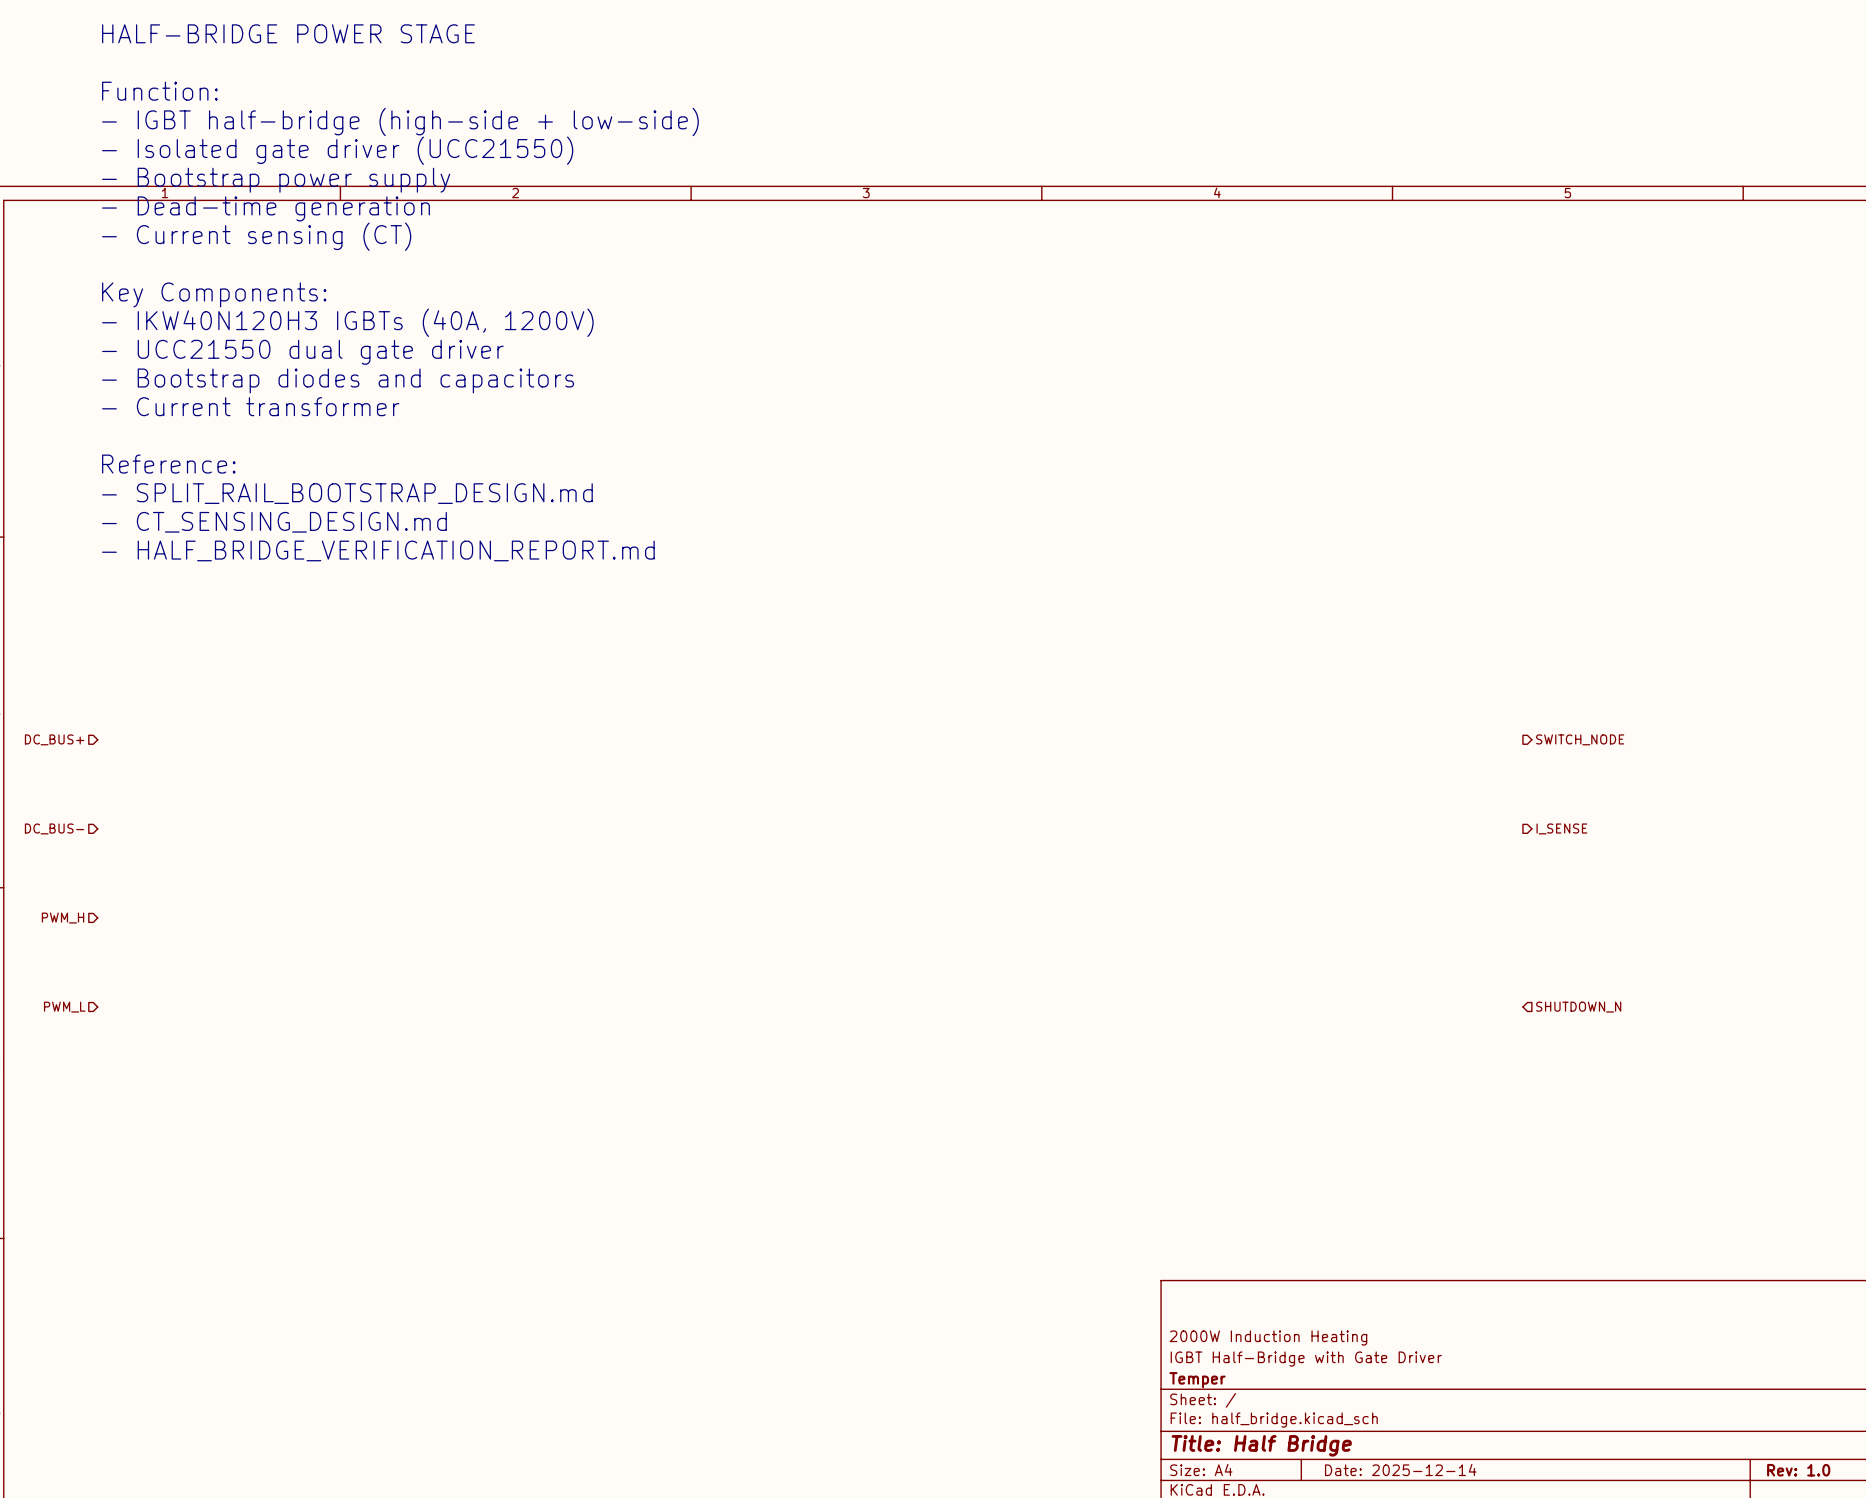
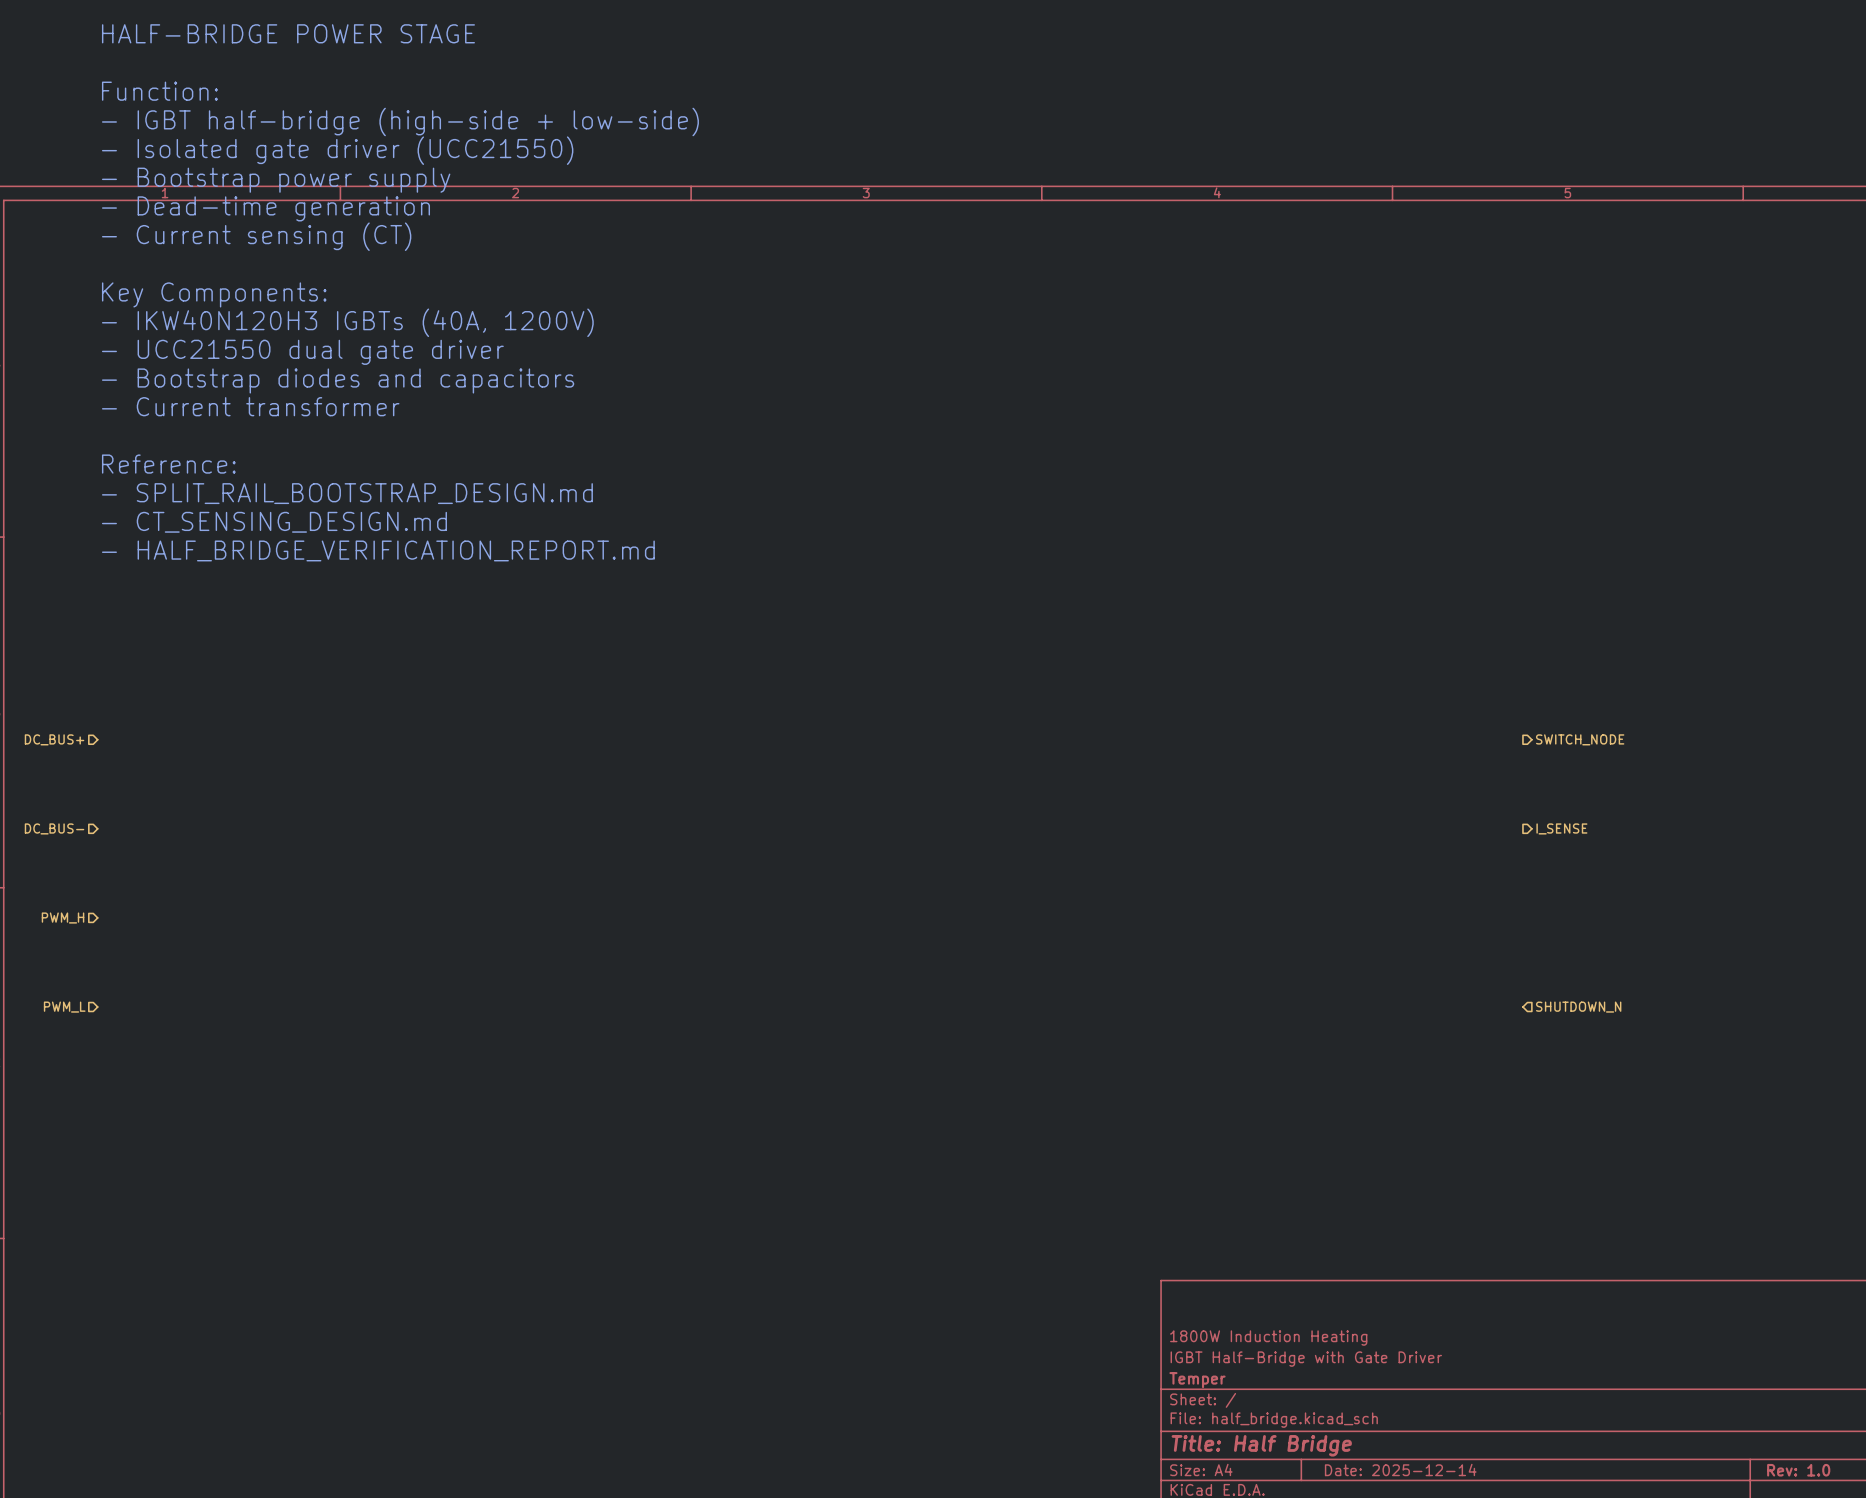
title block: 2000W Induction Heating (1268, 1338) -> 1800W Induction Heating (1268, 1338)

